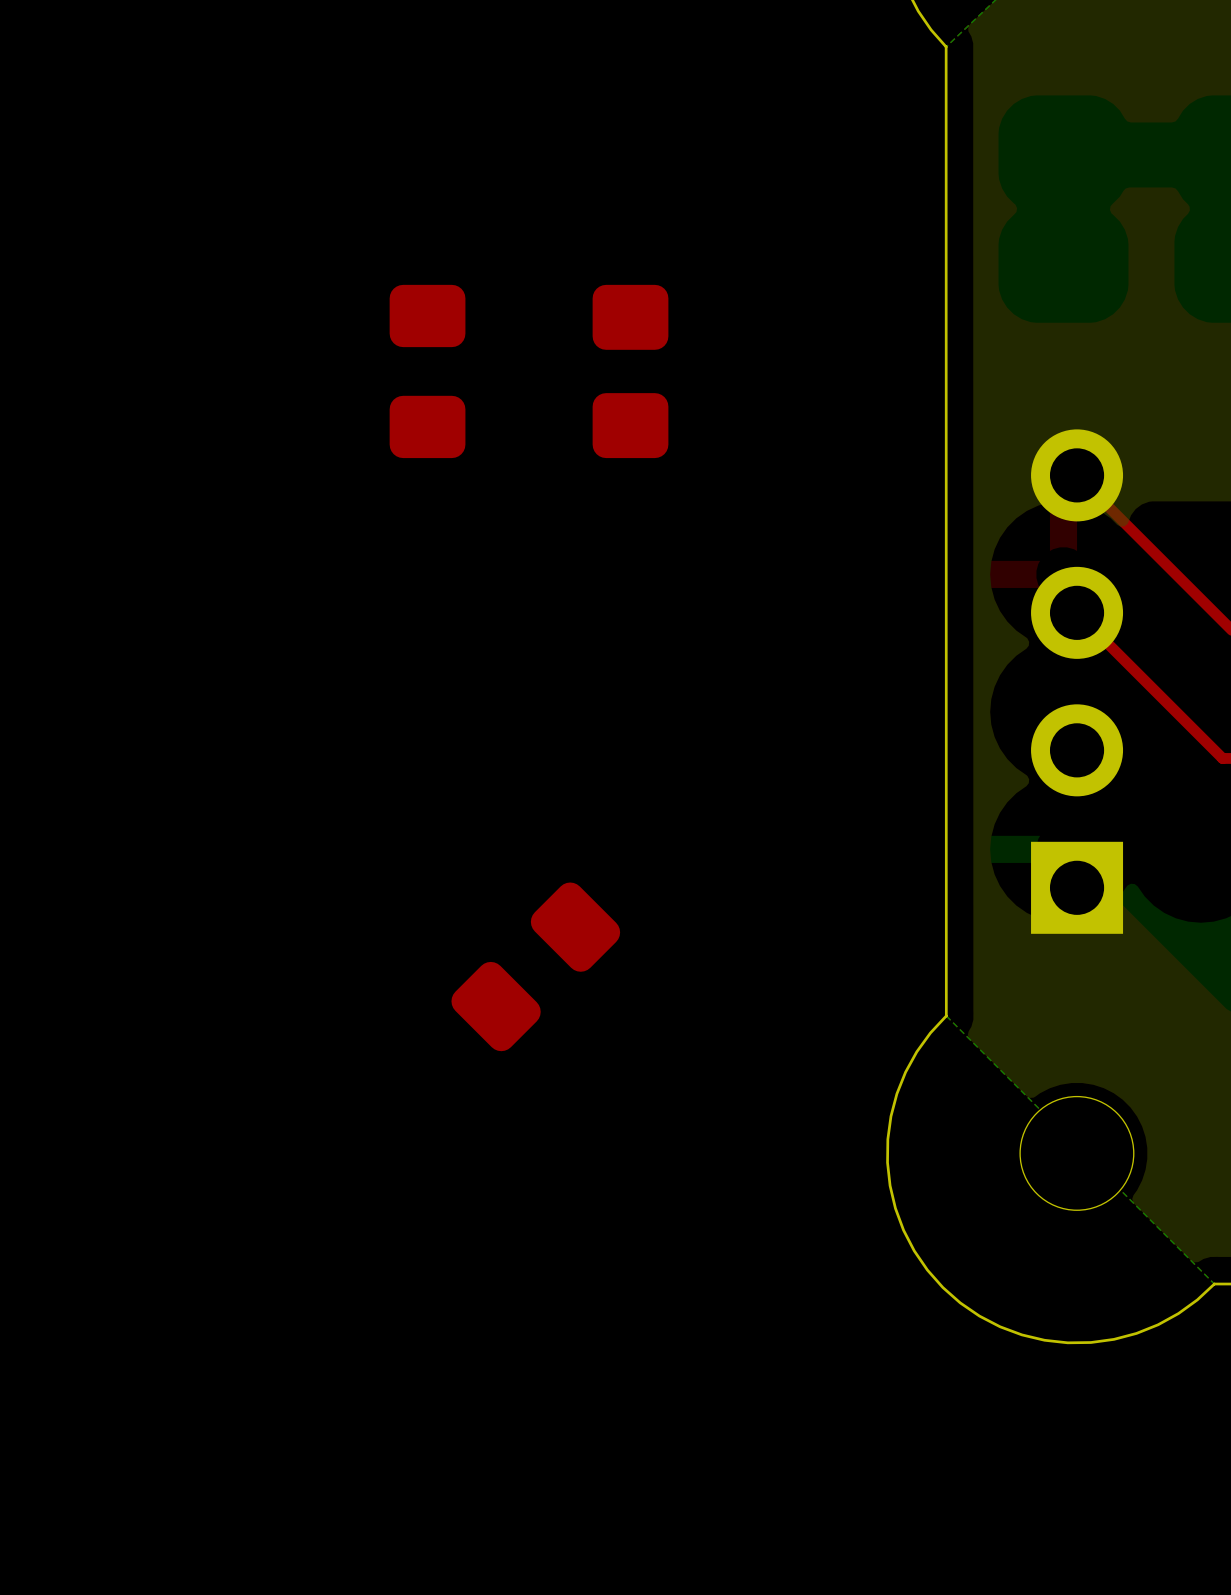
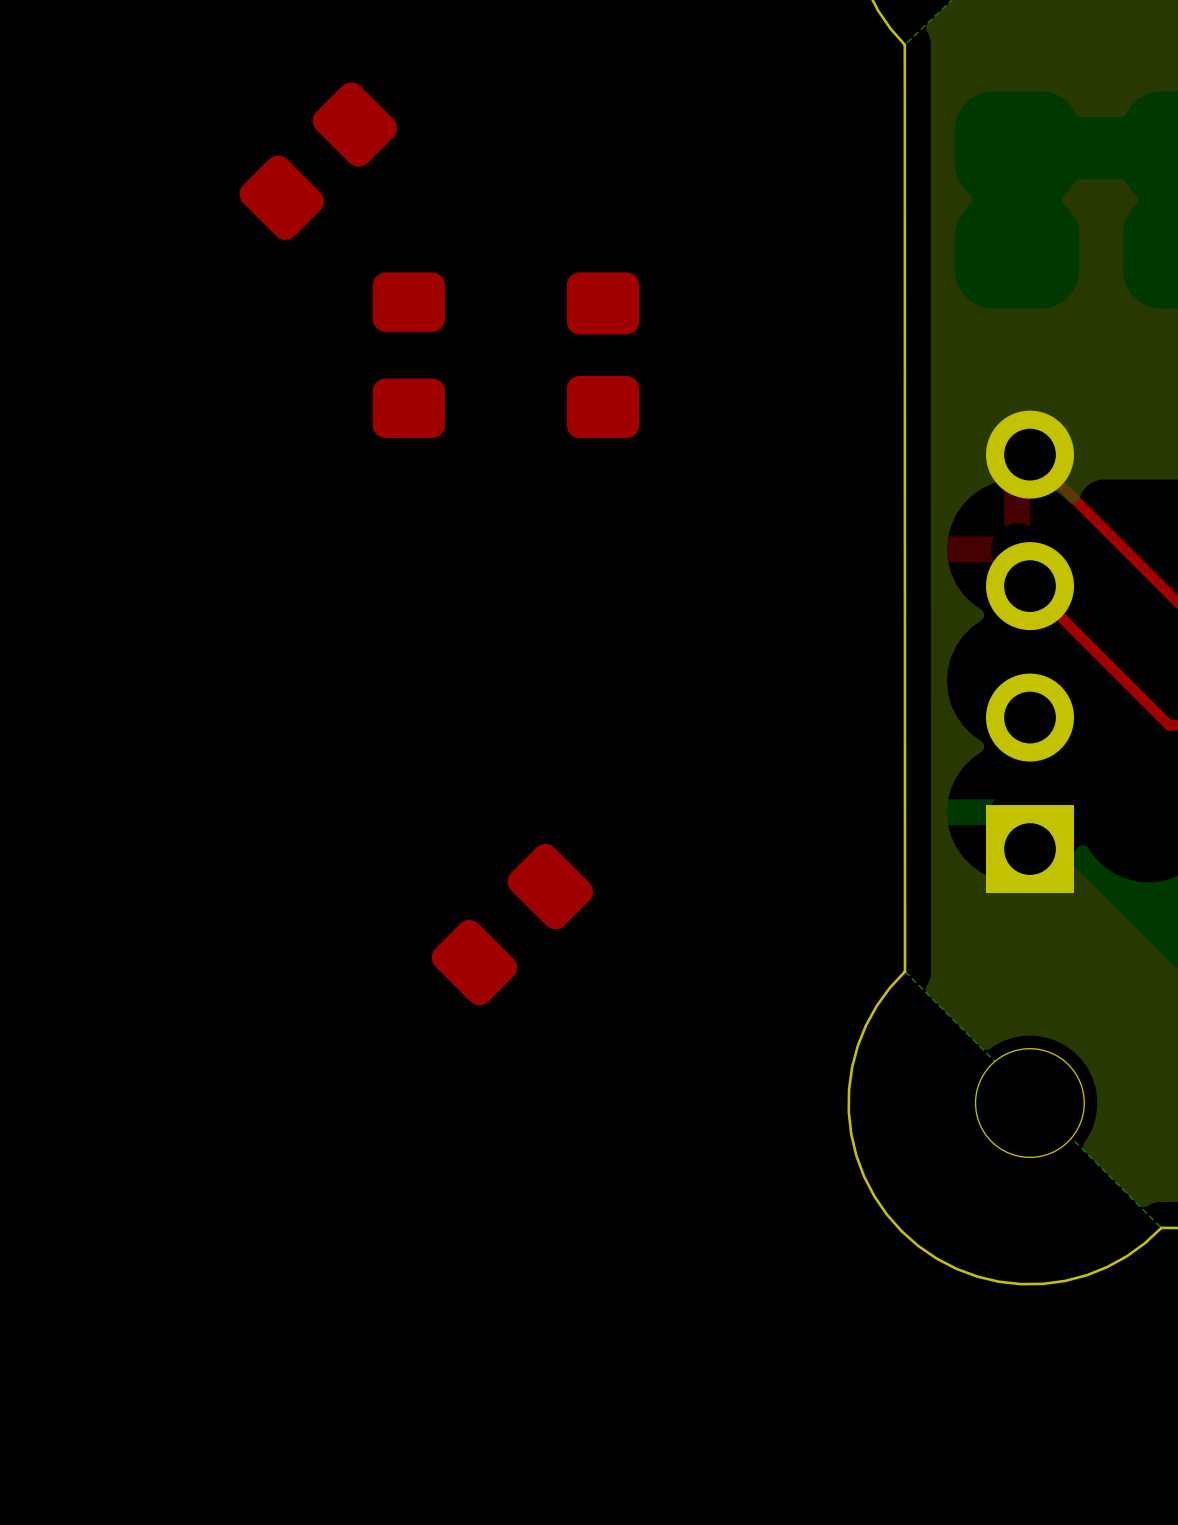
part: none -> (318, 161)

